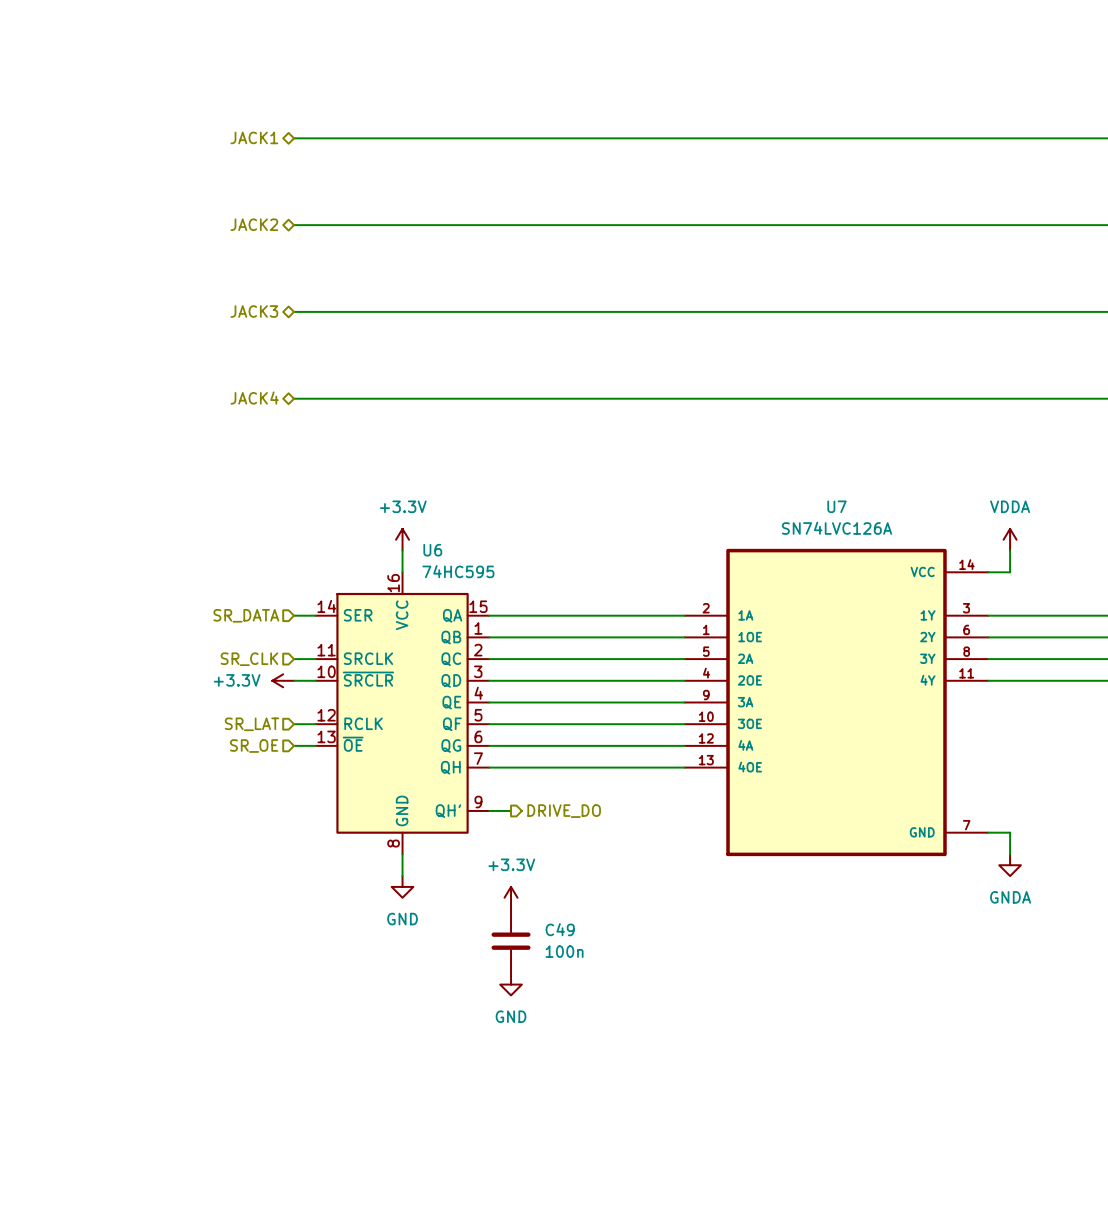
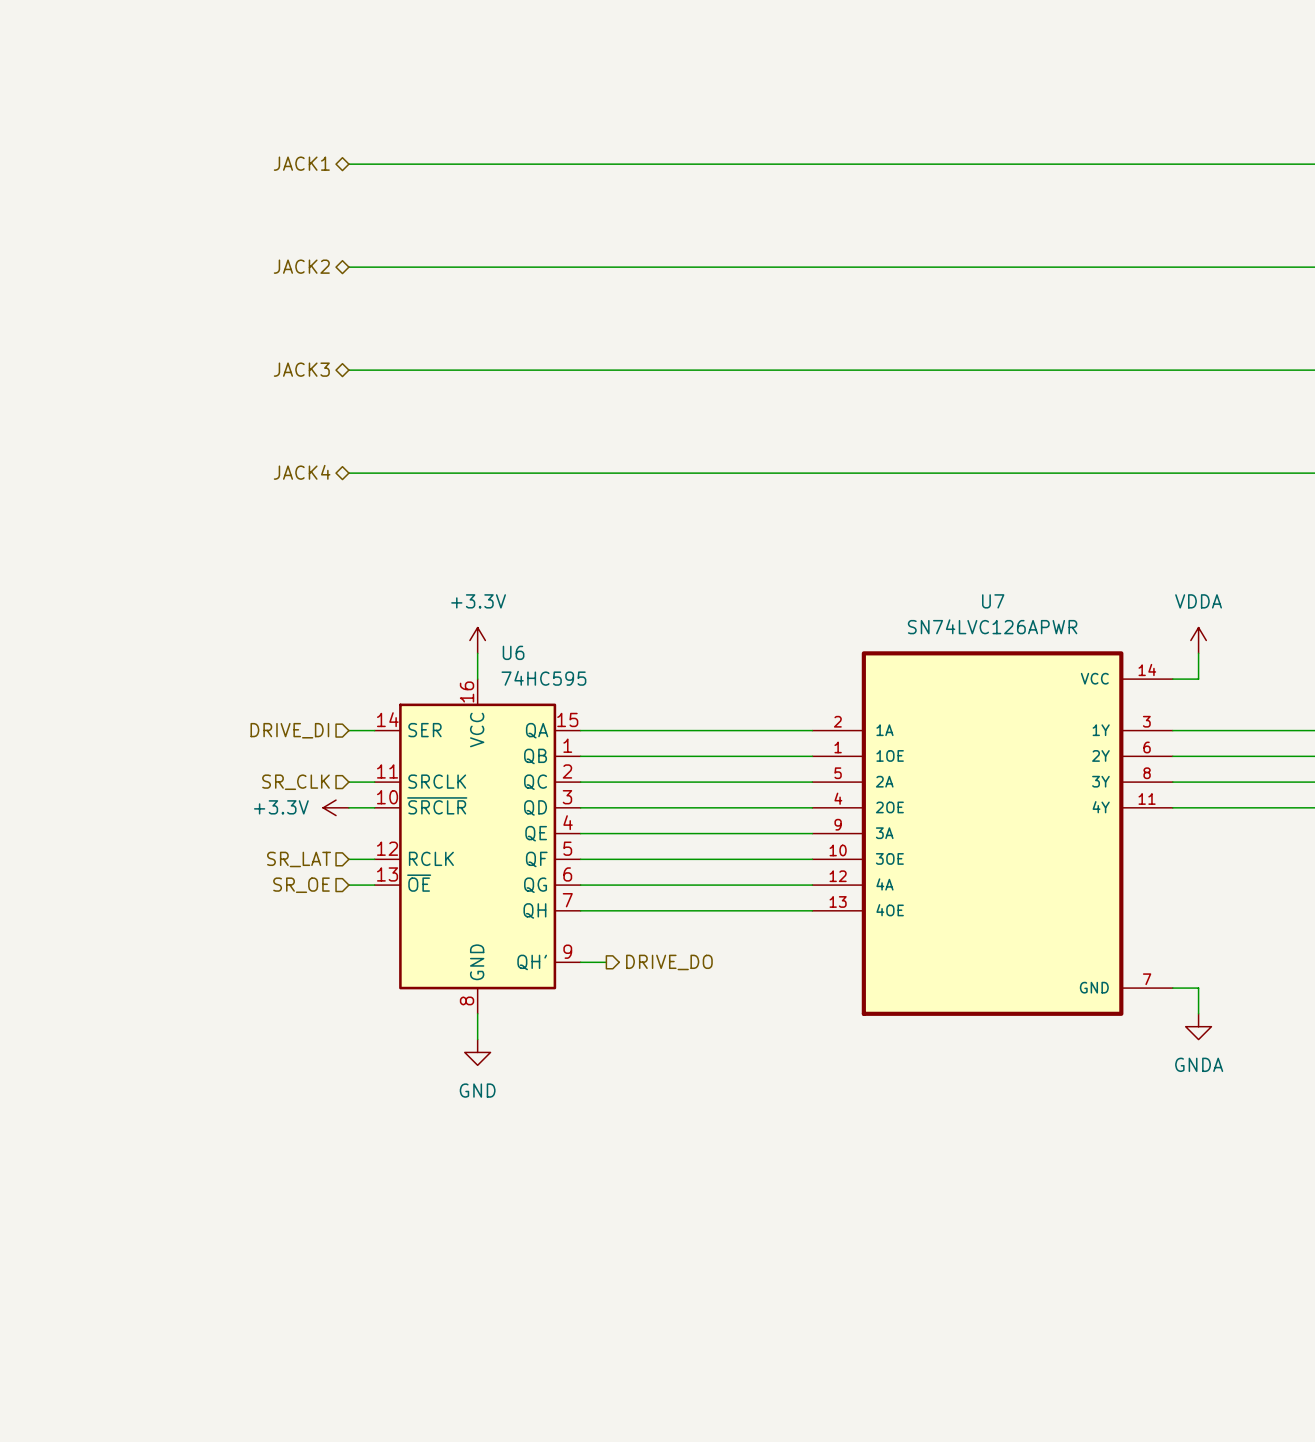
U7 value: SN74LVC126A (837, 528) -> SN74LVC126APWR (992, 626)
hierarchical label: SR_DATA (246, 615) -> DRIVE_DI (289, 730)
power symbol: +3.3V (511, 897) -> none
C49: 100n (511, 941) -> none
power symbol: GND (511, 984) -> none

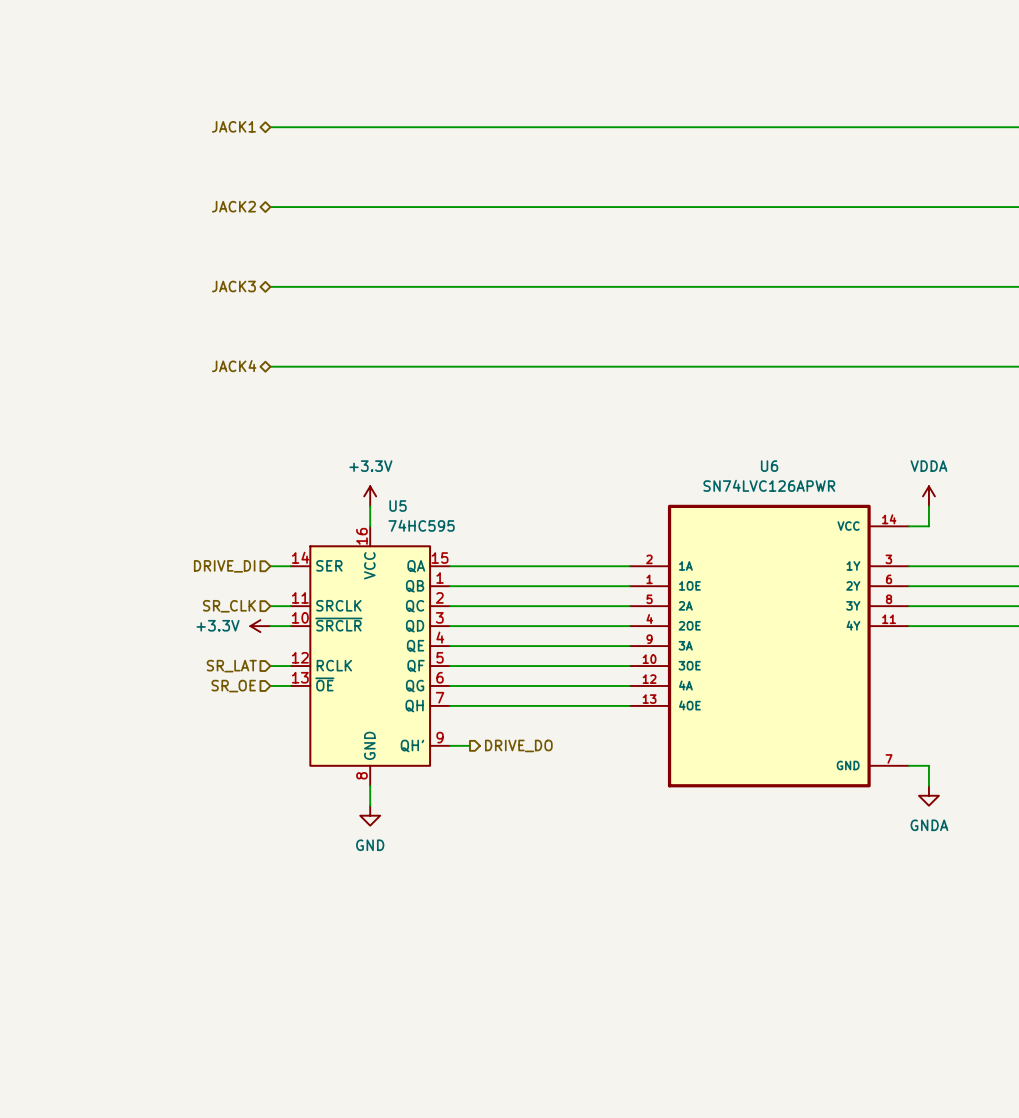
U7 name: U7 (993, 601) -> U6 (769, 466)
U6 name: U6 (513, 652) -> U5 (398, 506)

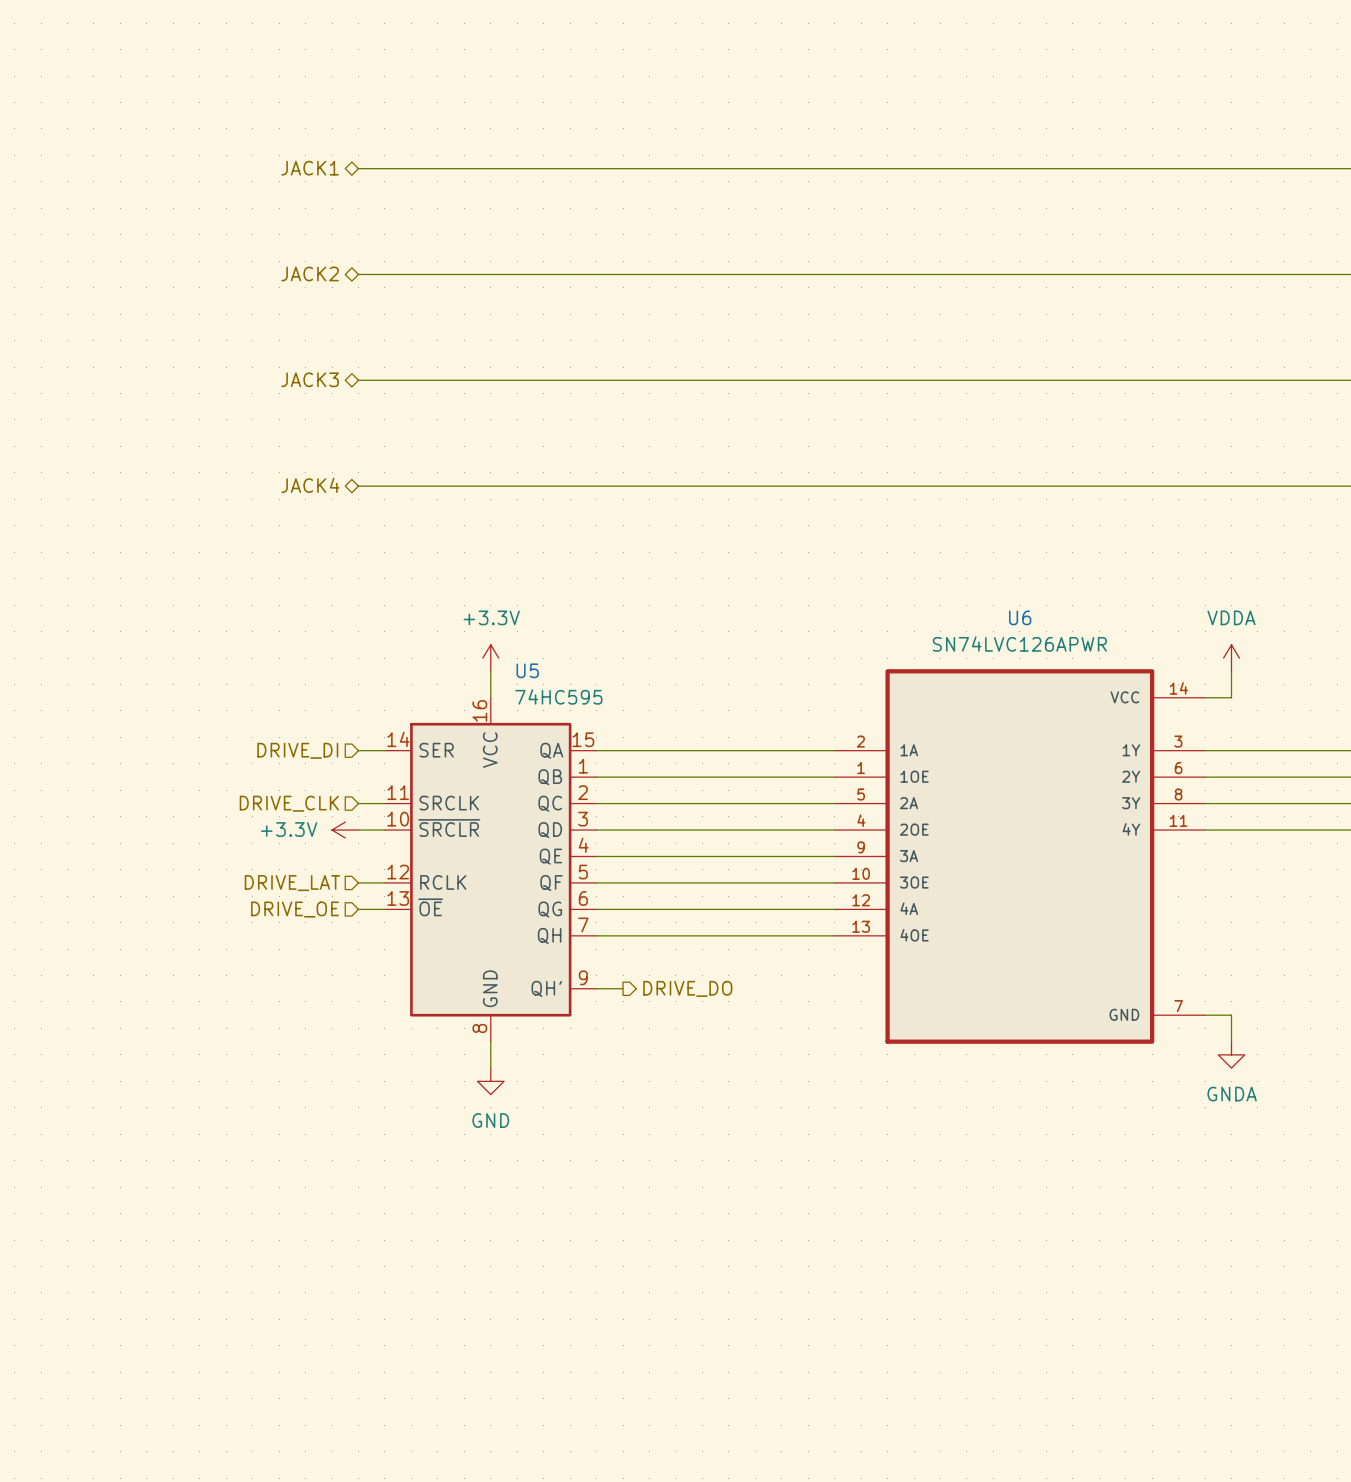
hierarchical label: SR_CLK (229, 606) -> DRIVE_CLK (289, 803)
hierarchical label: SR_LAT (231, 666) -> DRIVE_LAT (292, 883)
hierarchical label: SR_OE (233, 686) -> DRIVE_OE (294, 909)

